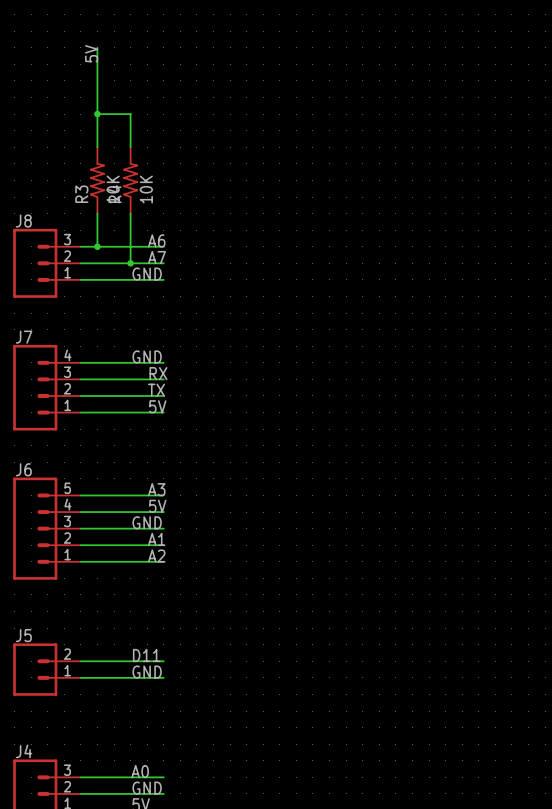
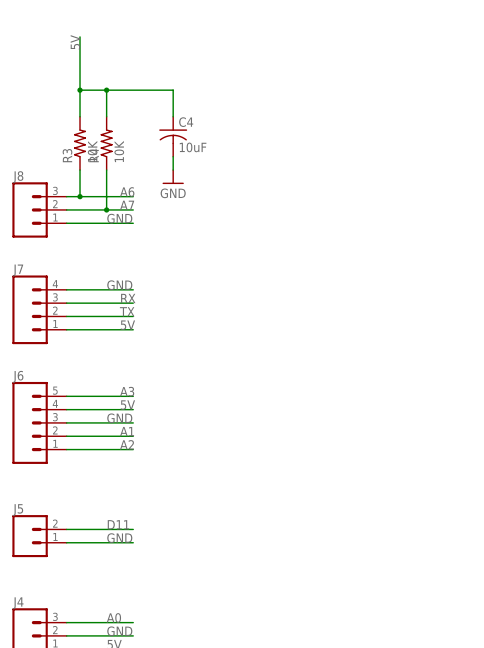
wire: none -> (106, 90) (173, 90) (173, 116)
junction: none -> (106, 90)
C4: none -> 10uF (173, 136)
wire: none -> (173, 156) (173, 170)
power symbol: none -> GND (173, 177)

